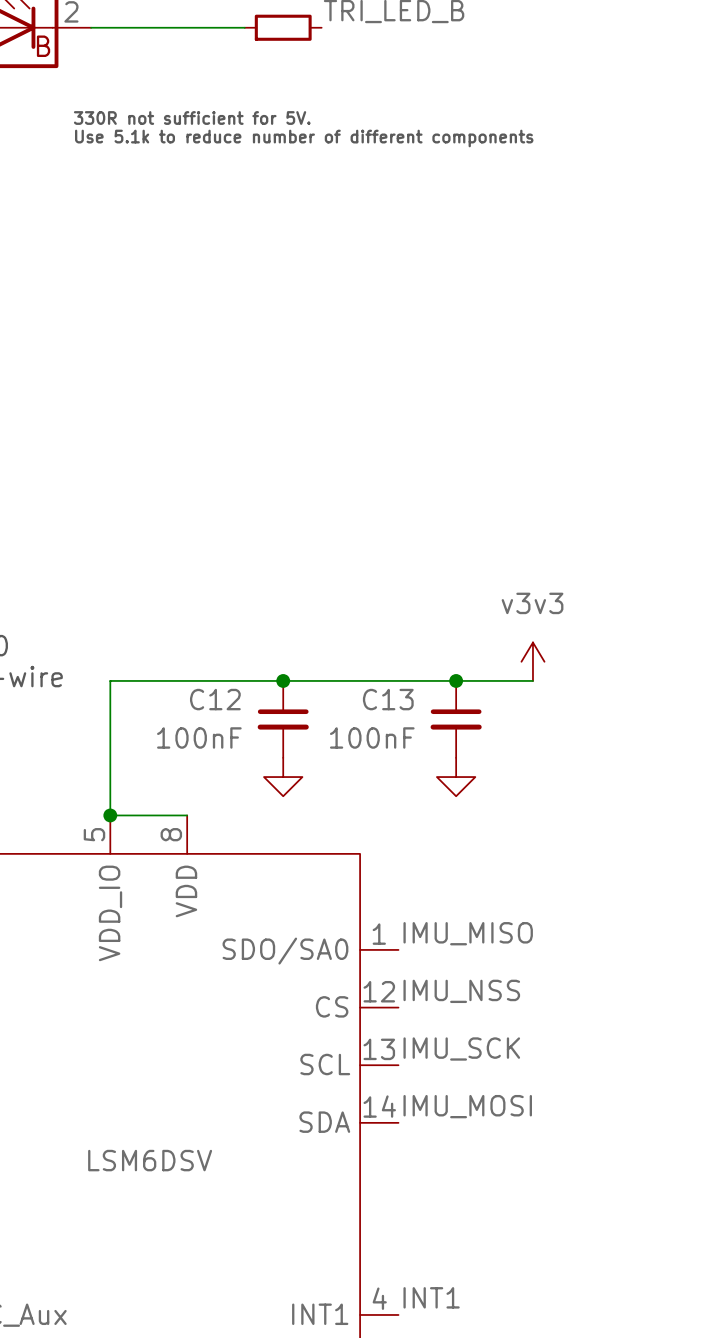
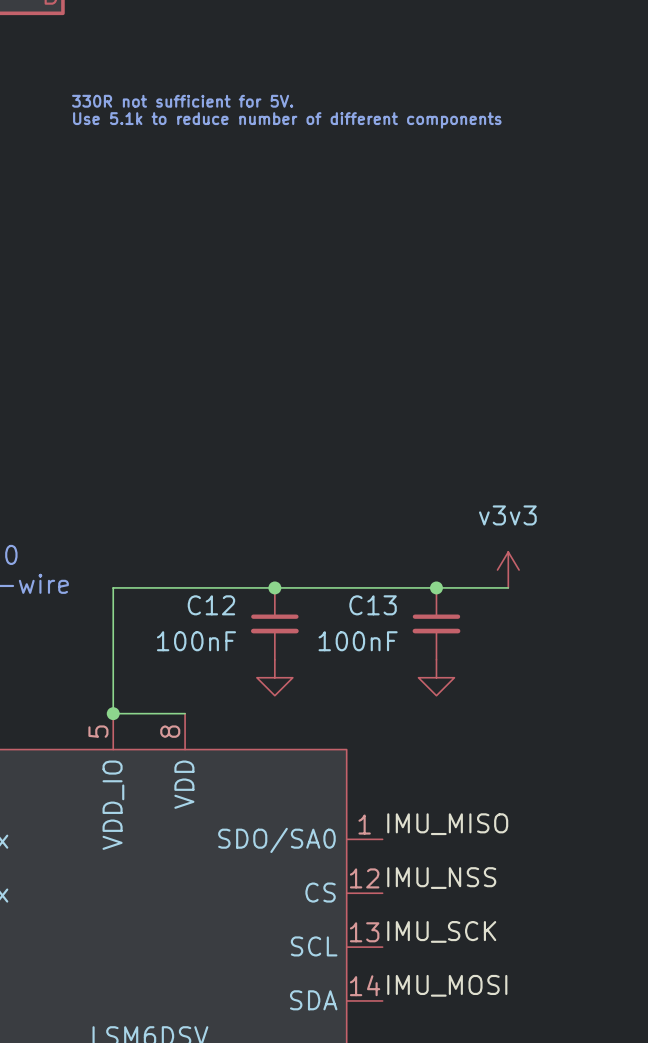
text position: 330R not sufficient for 5V. (192, 118) -> 330R not sufficient for 5V. (182, 101)
text position: Use 5.1k to reduce number of different components (304, 138) -> Use 5.1k to reduce number of different components (287, 120)

